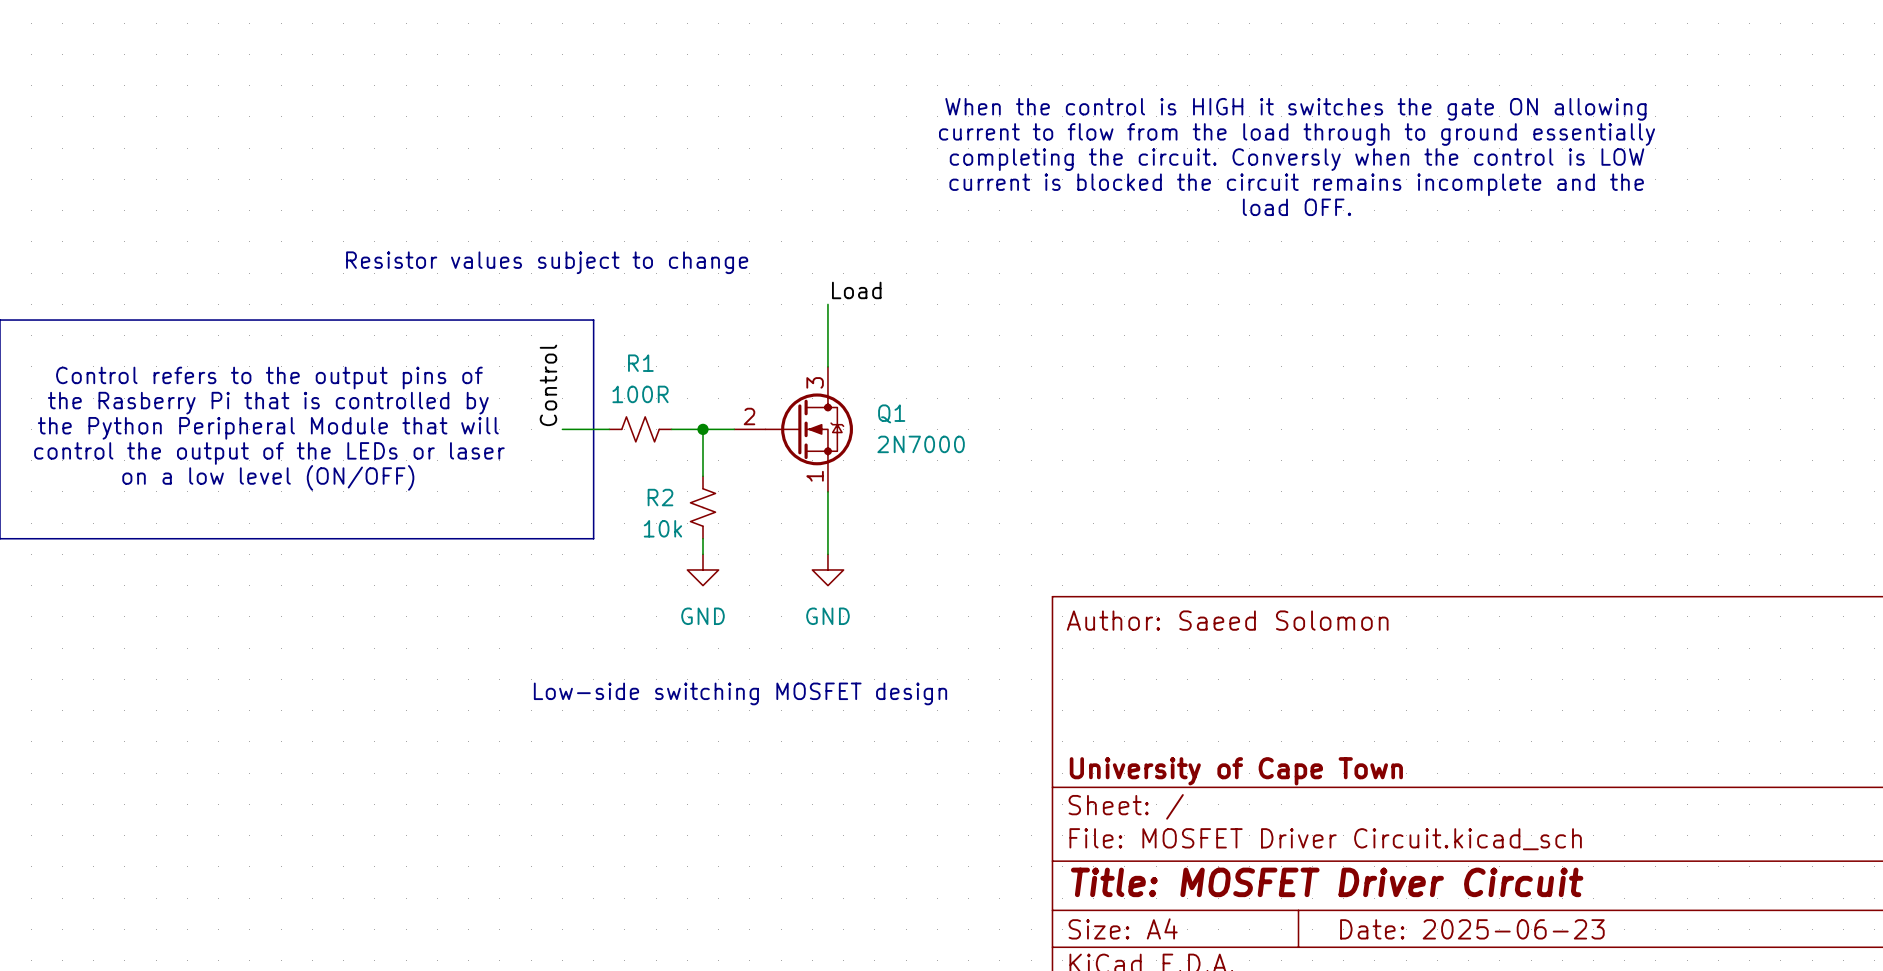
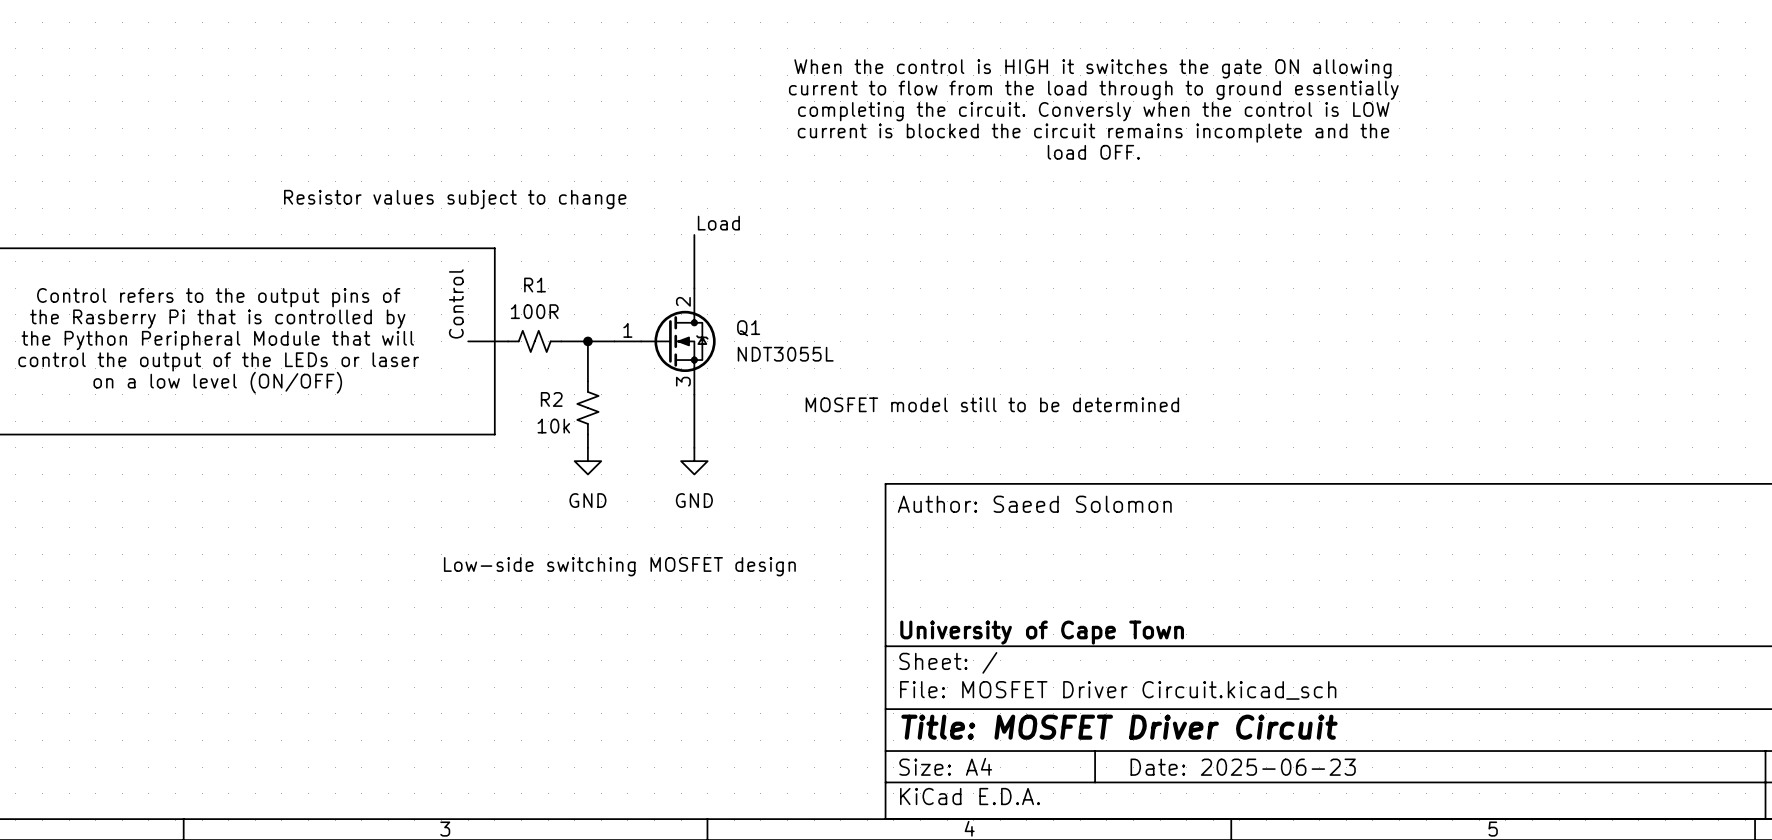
Q1 pin number: 3 (815, 382) -> 2 (683, 301)
Q1 pin number: 2 (749, 416) -> 1 (627, 330)
Q1 value: 2N7000 (921, 444) -> NDT3055L (785, 354)
Q1 pin number: 1 (815, 476) -> 3 (683, 381)
text: none -> MOSFET model still to be determined (992, 404)

